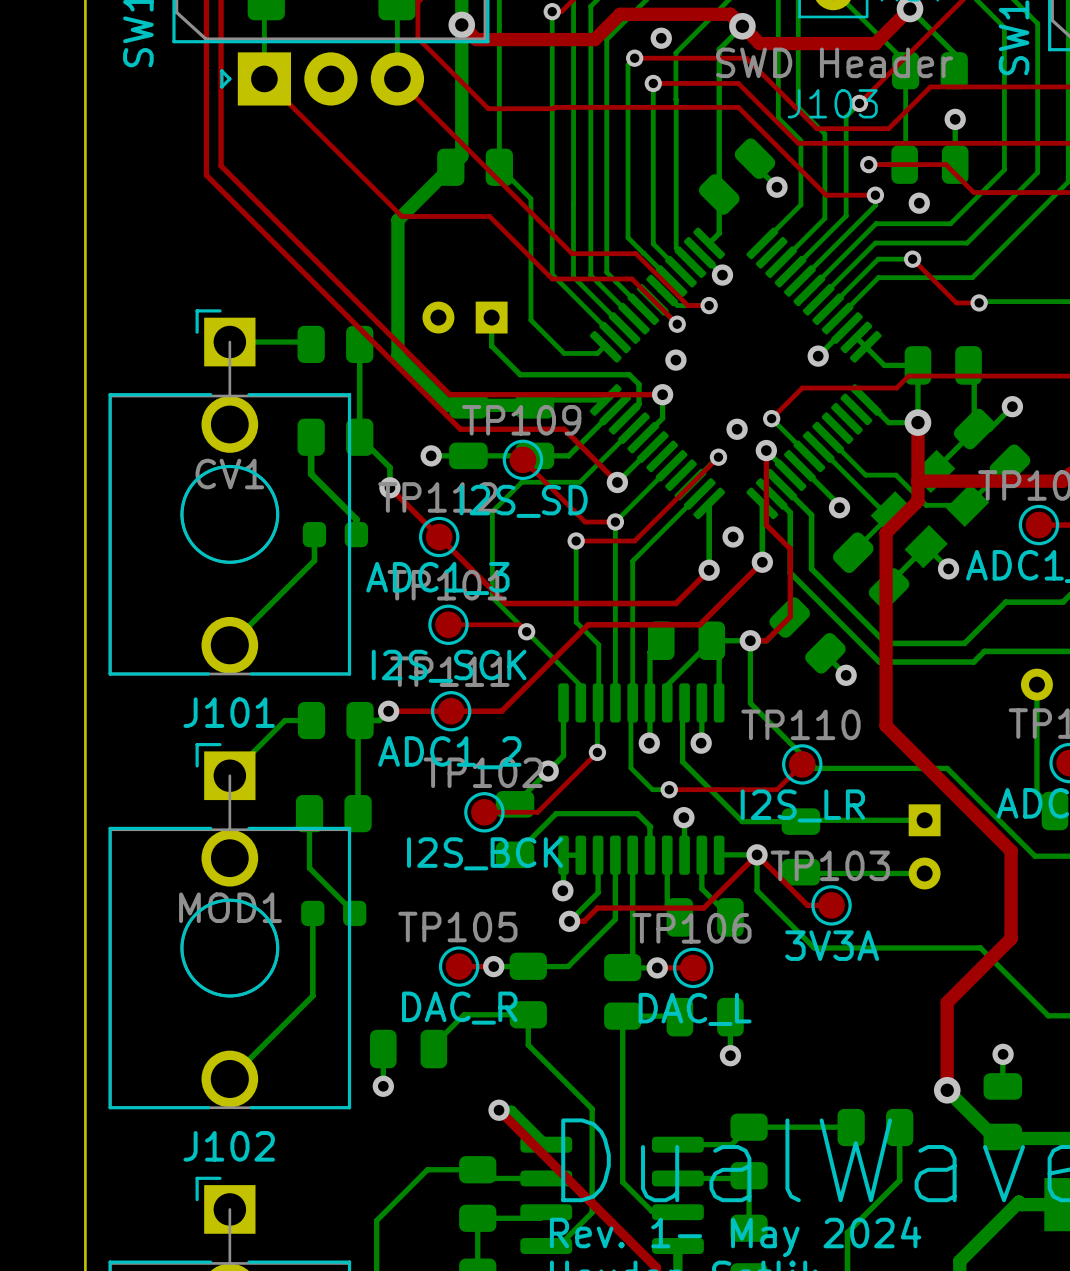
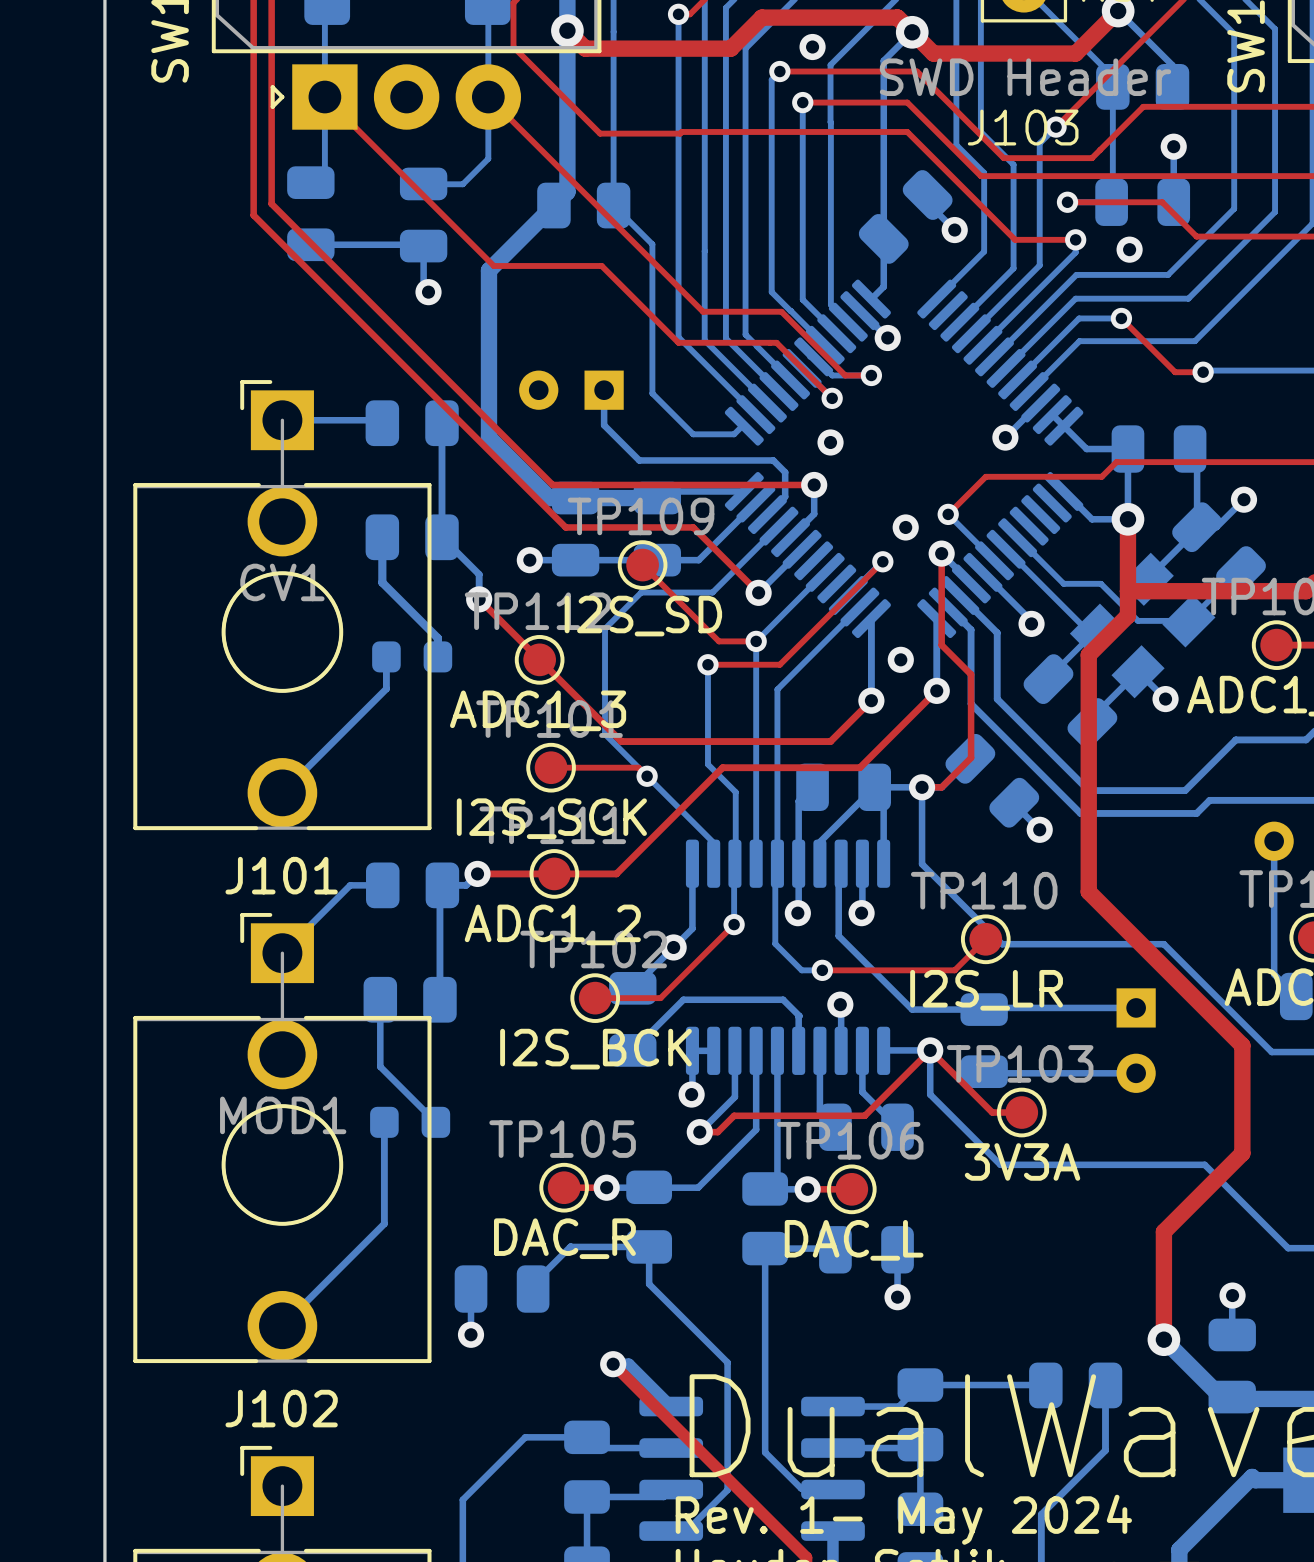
bottom track: none -> (324, 97) (324, 168) (310, 182)
bottom track: none -> (488, 97) (488, 158) (462, 184) (423, 184)
part: none -> (310, 213)
part: none -> (423, 215)
bottom track: none -> (310, 244) (422, 244) (423, 287) (428, 292)
via: none -> (428, 292)

